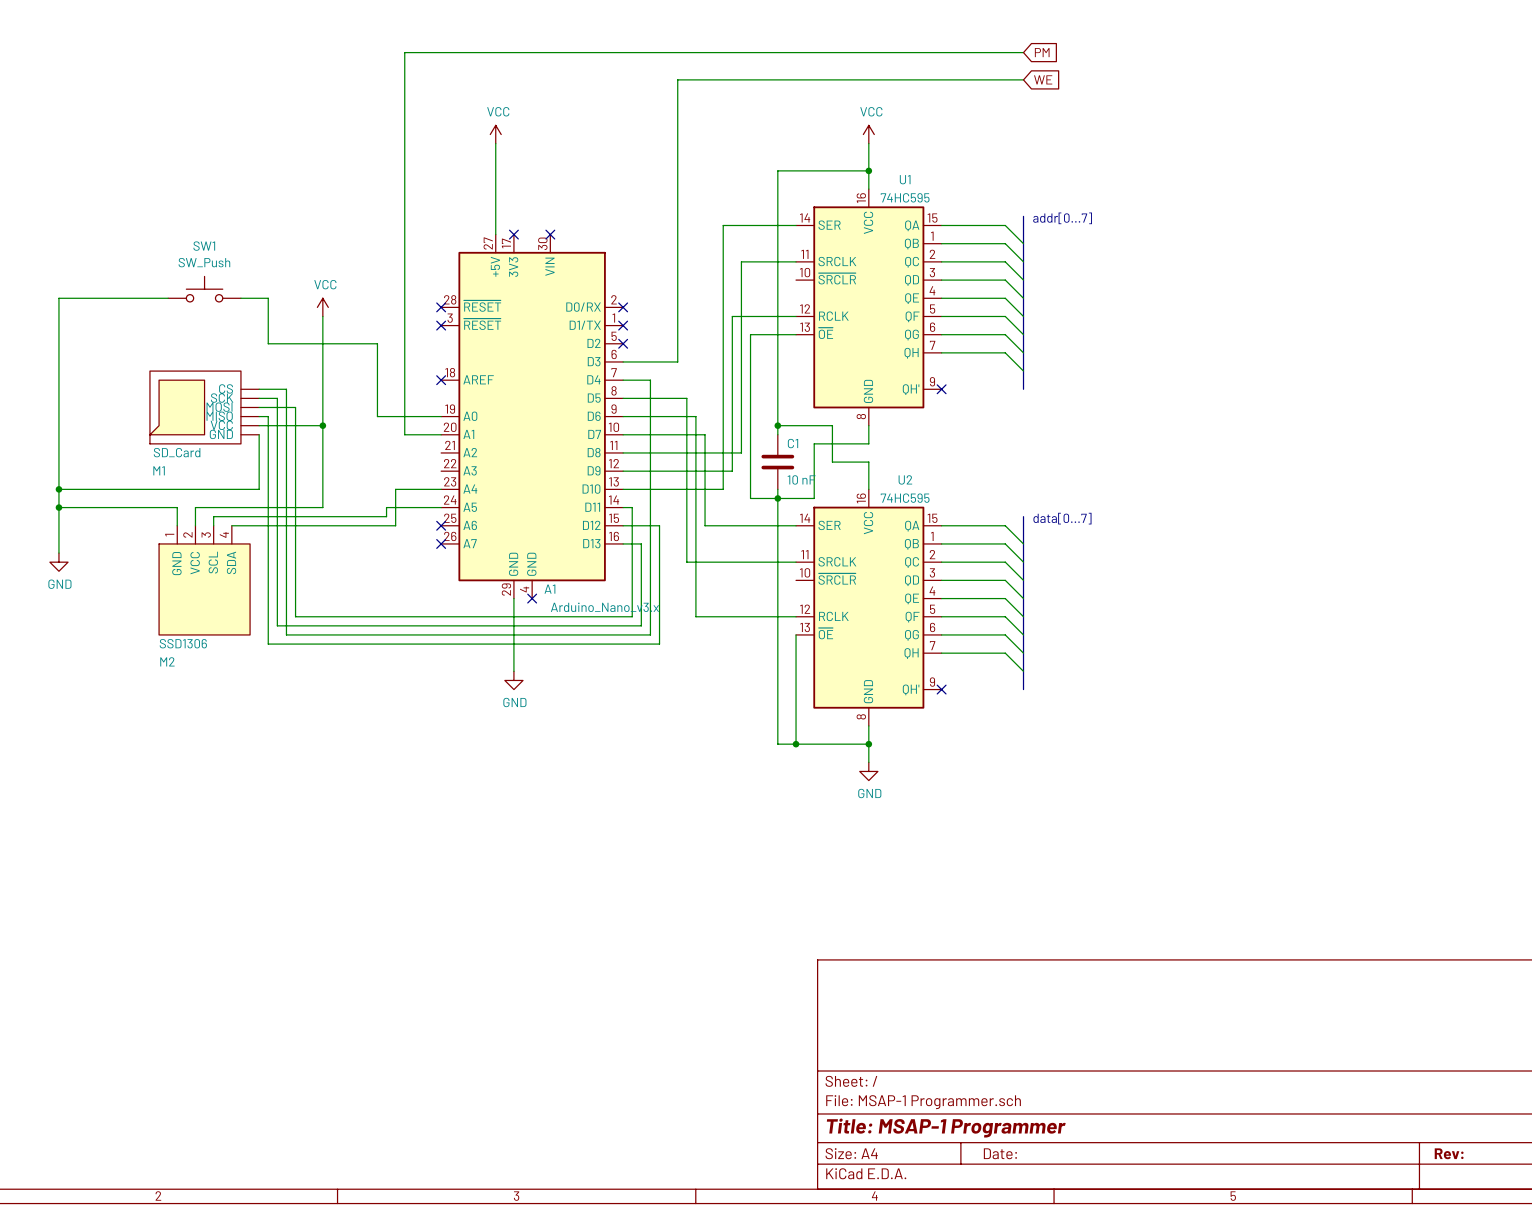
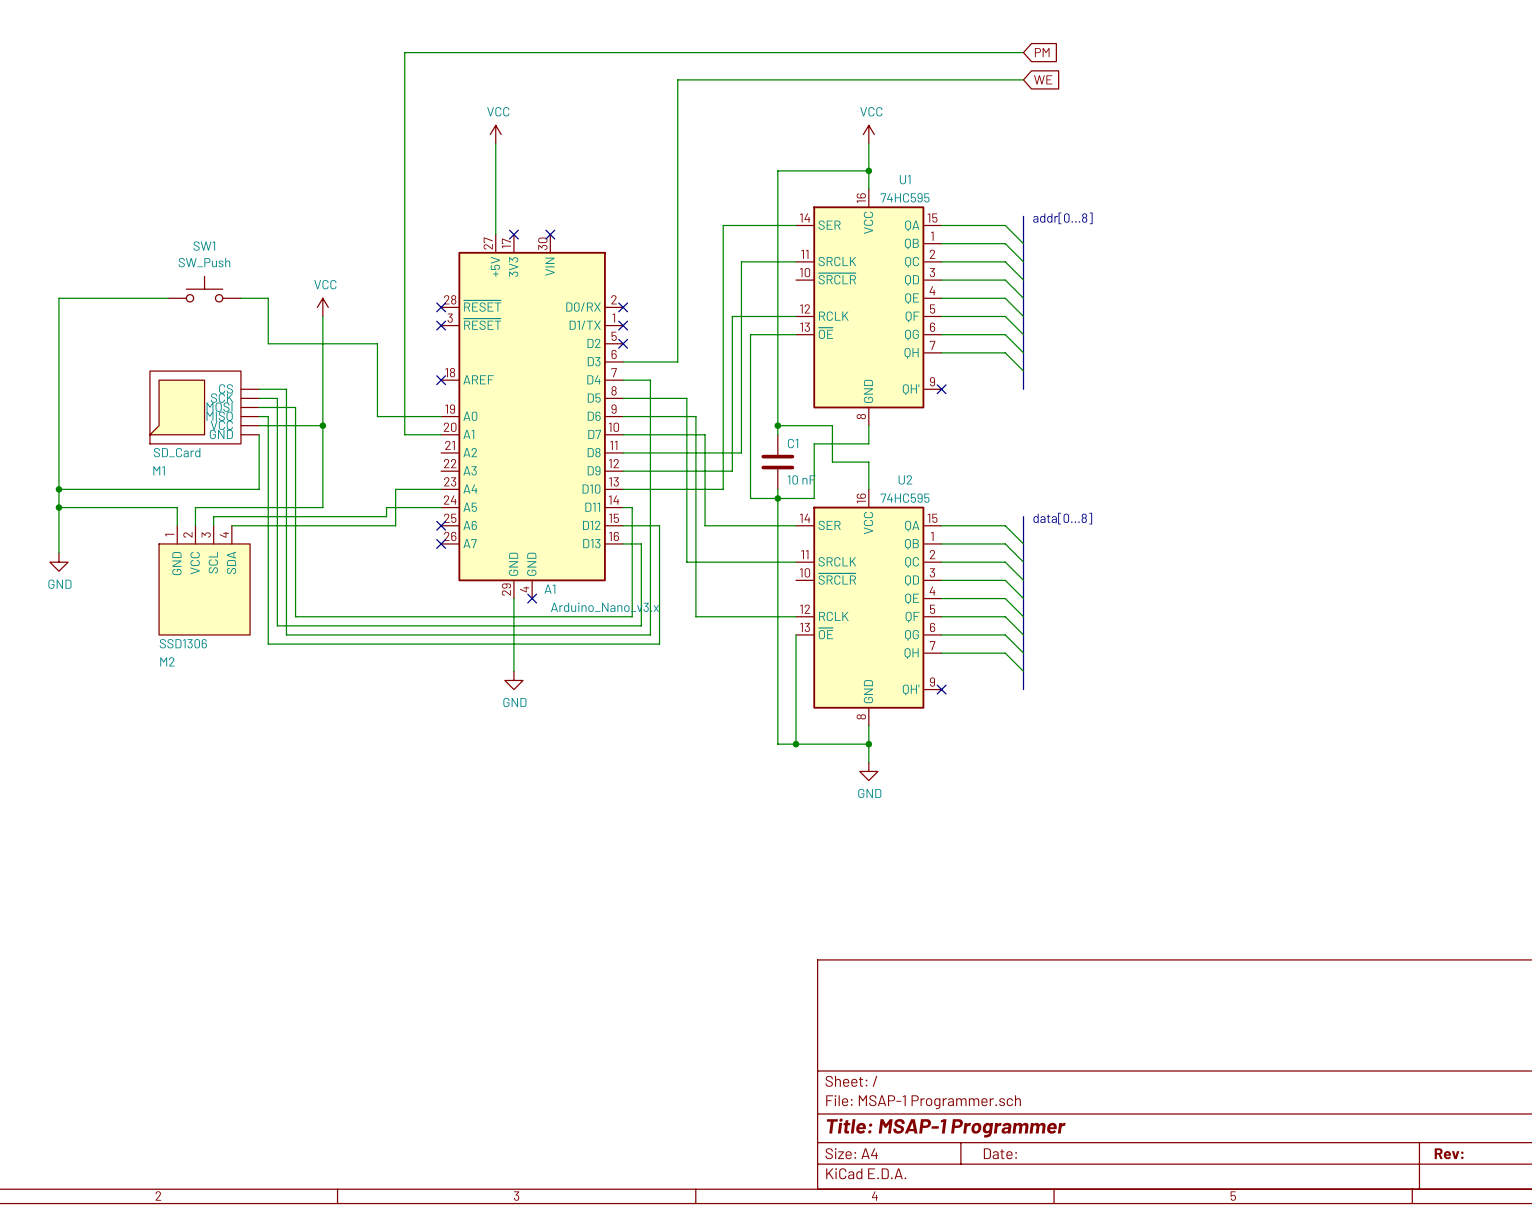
text: addr[0...7] (1062, 218) -> addr[0...8] (1062, 218)
text: data[0...7] (1062, 518) -> data[0...8] (1062, 518)

